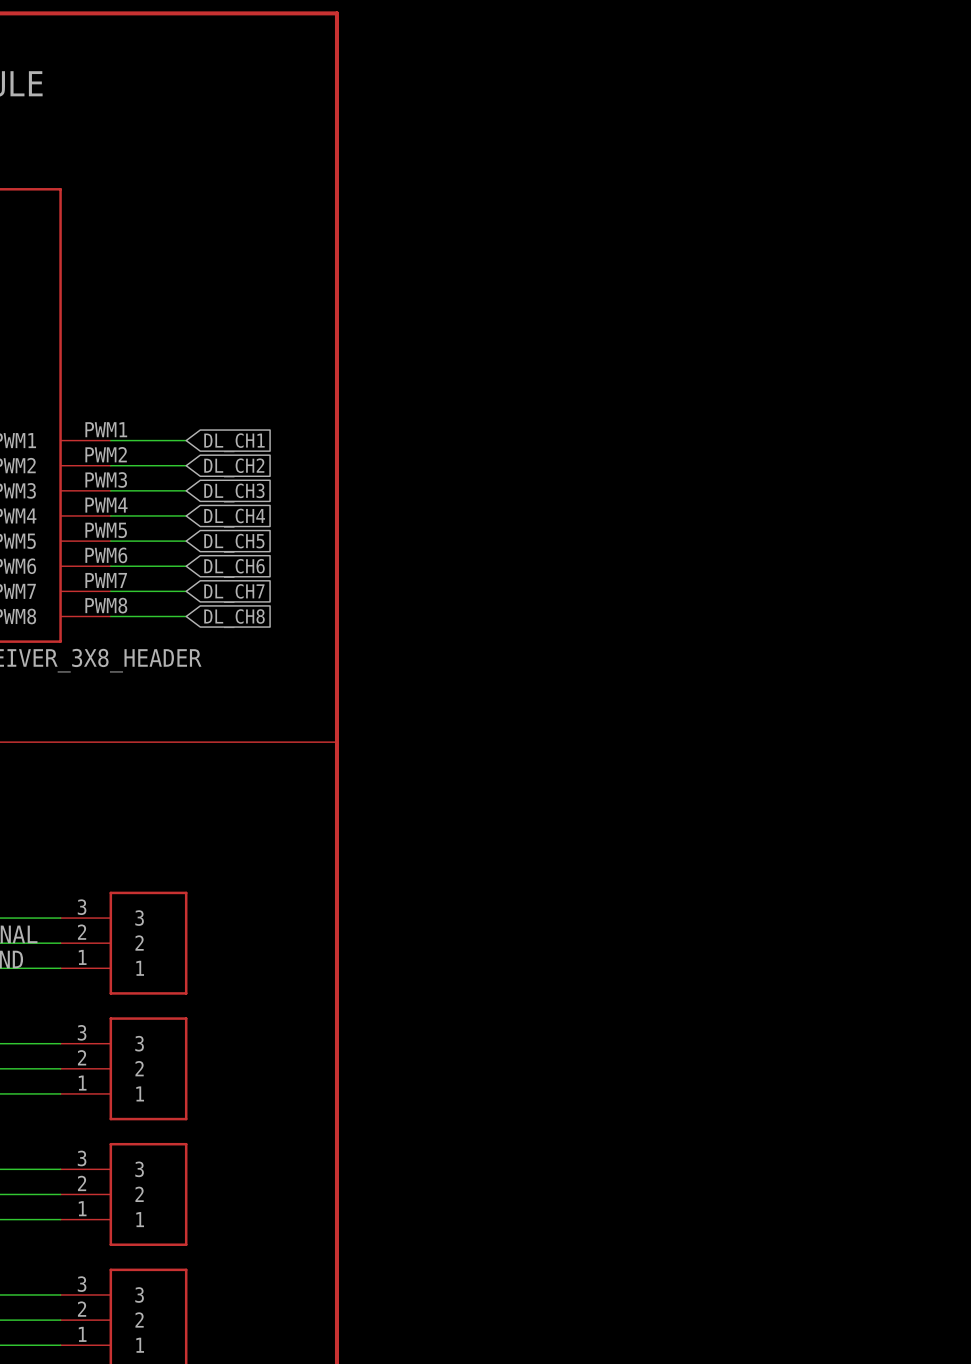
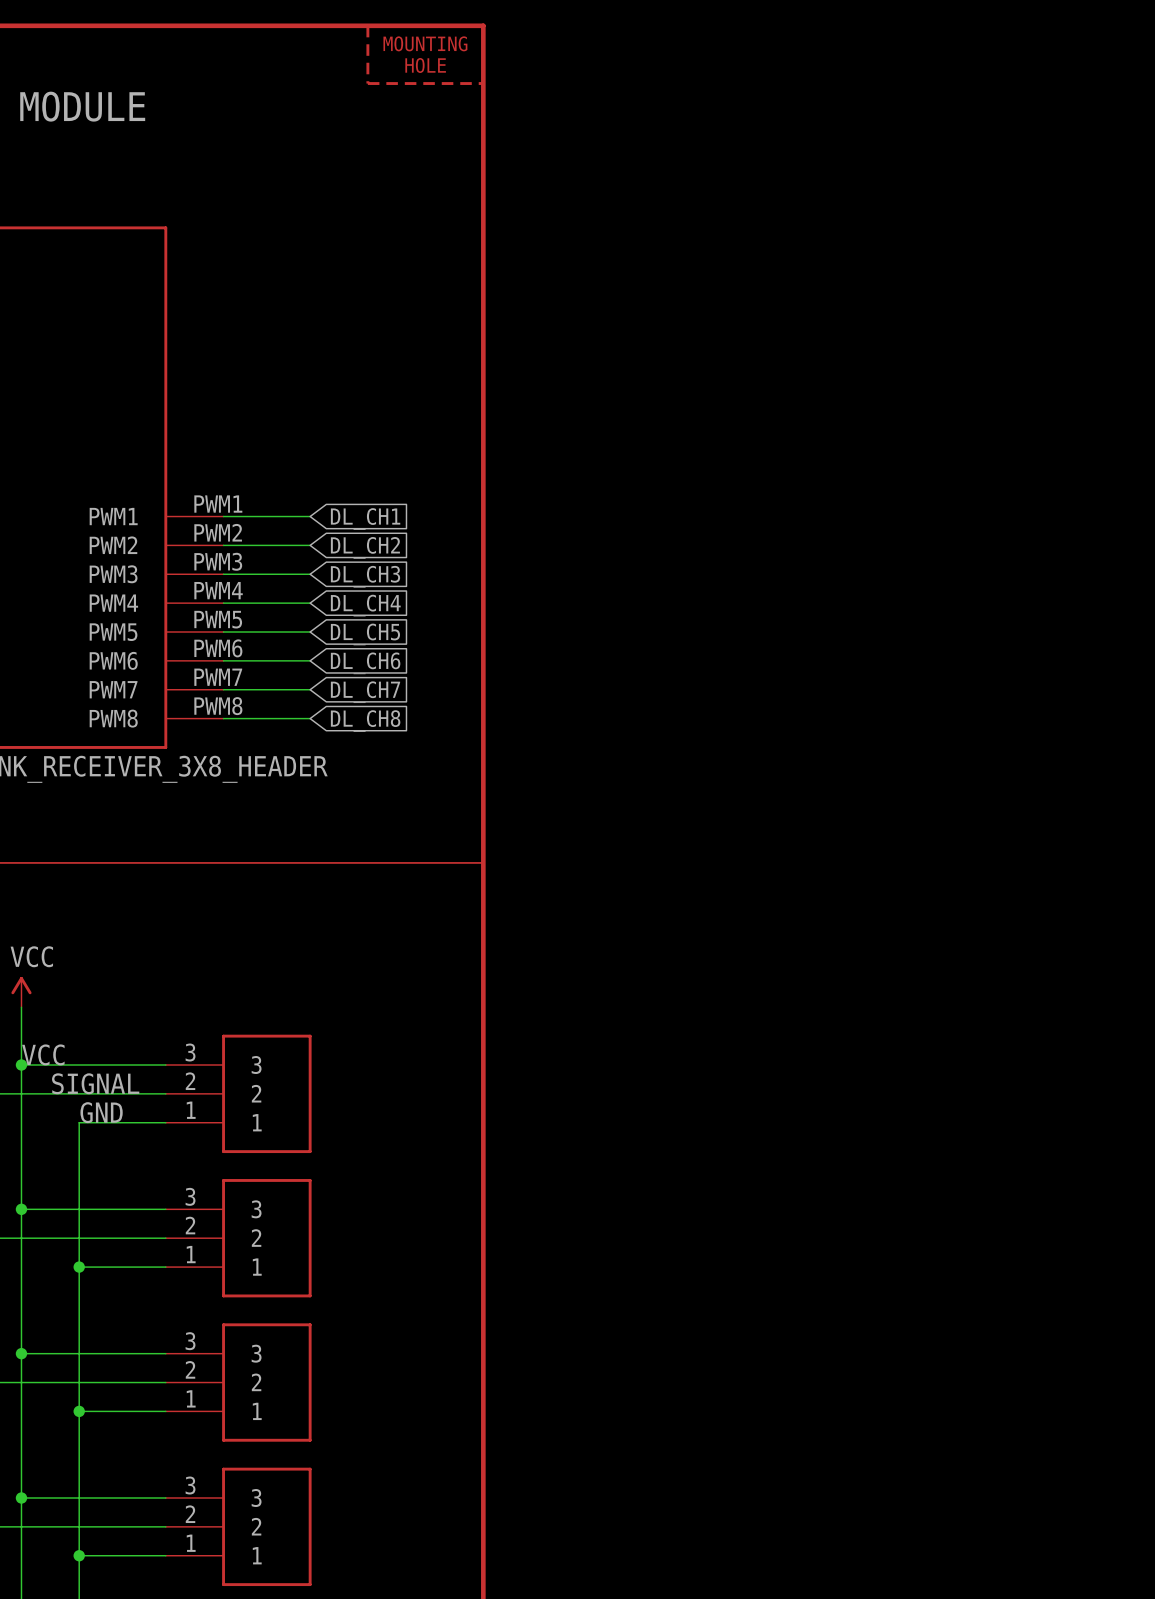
part: none -> (425, 54)

